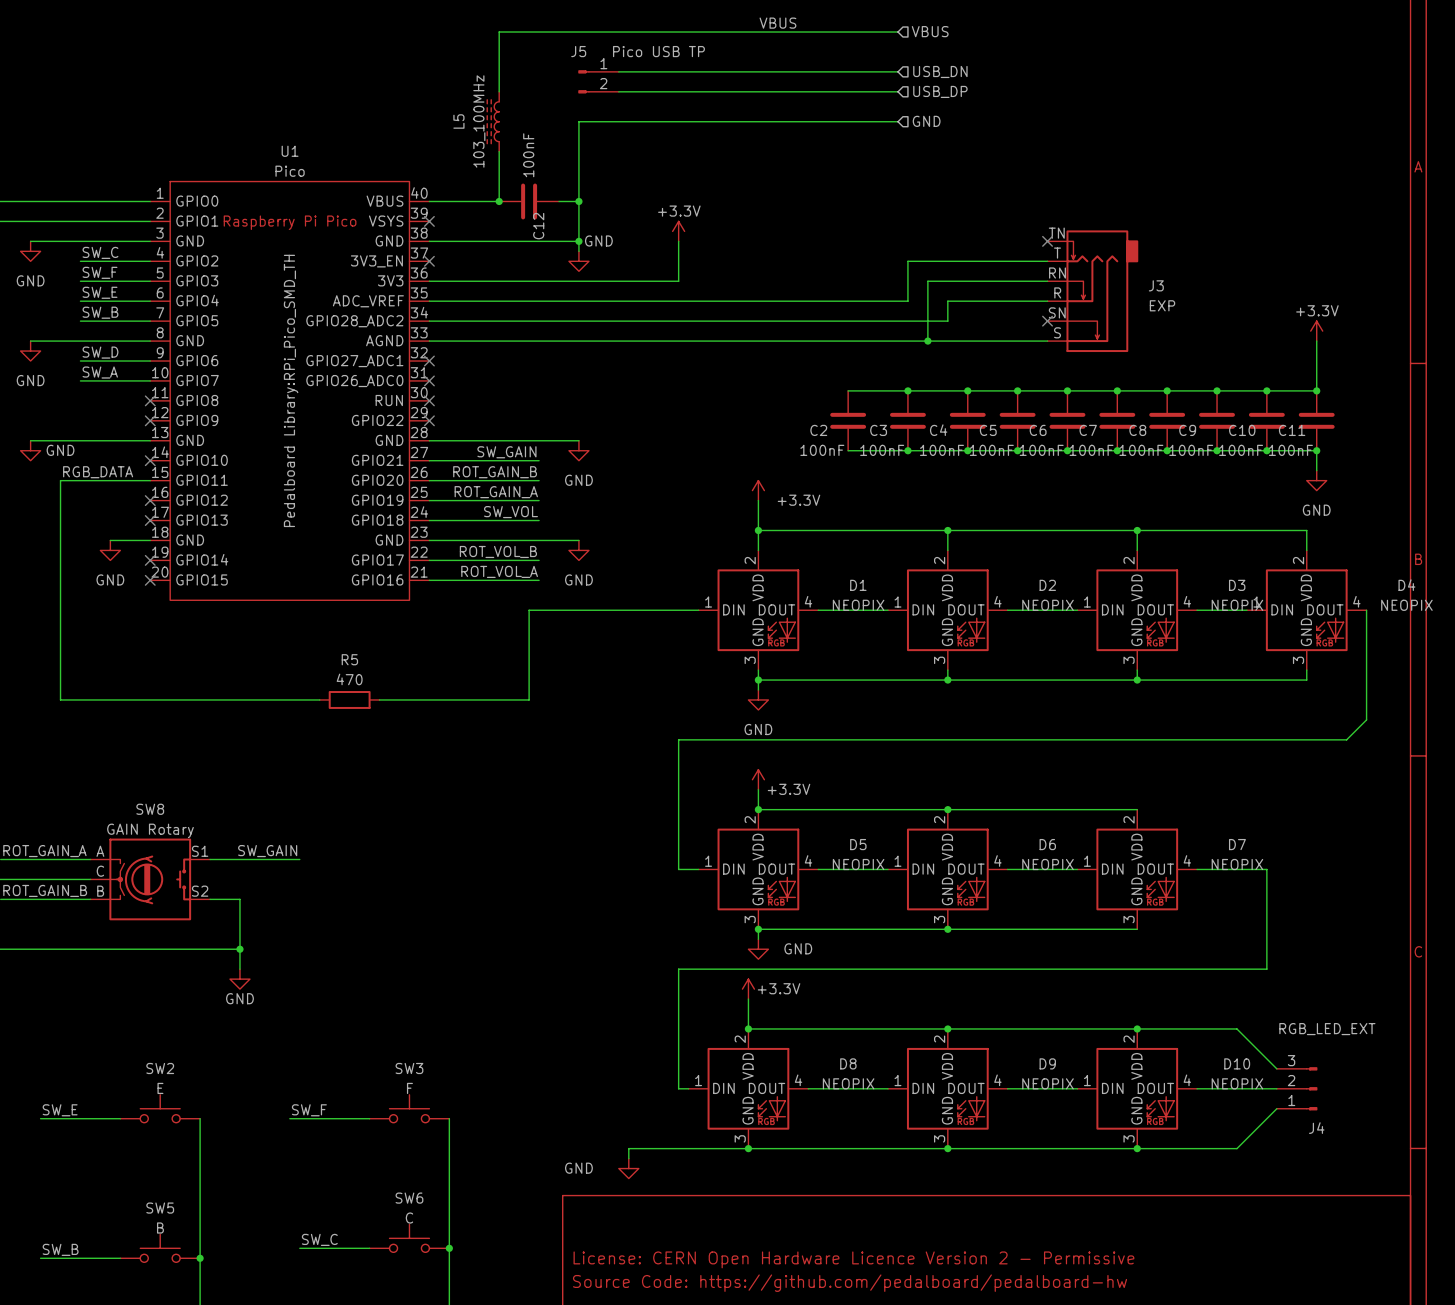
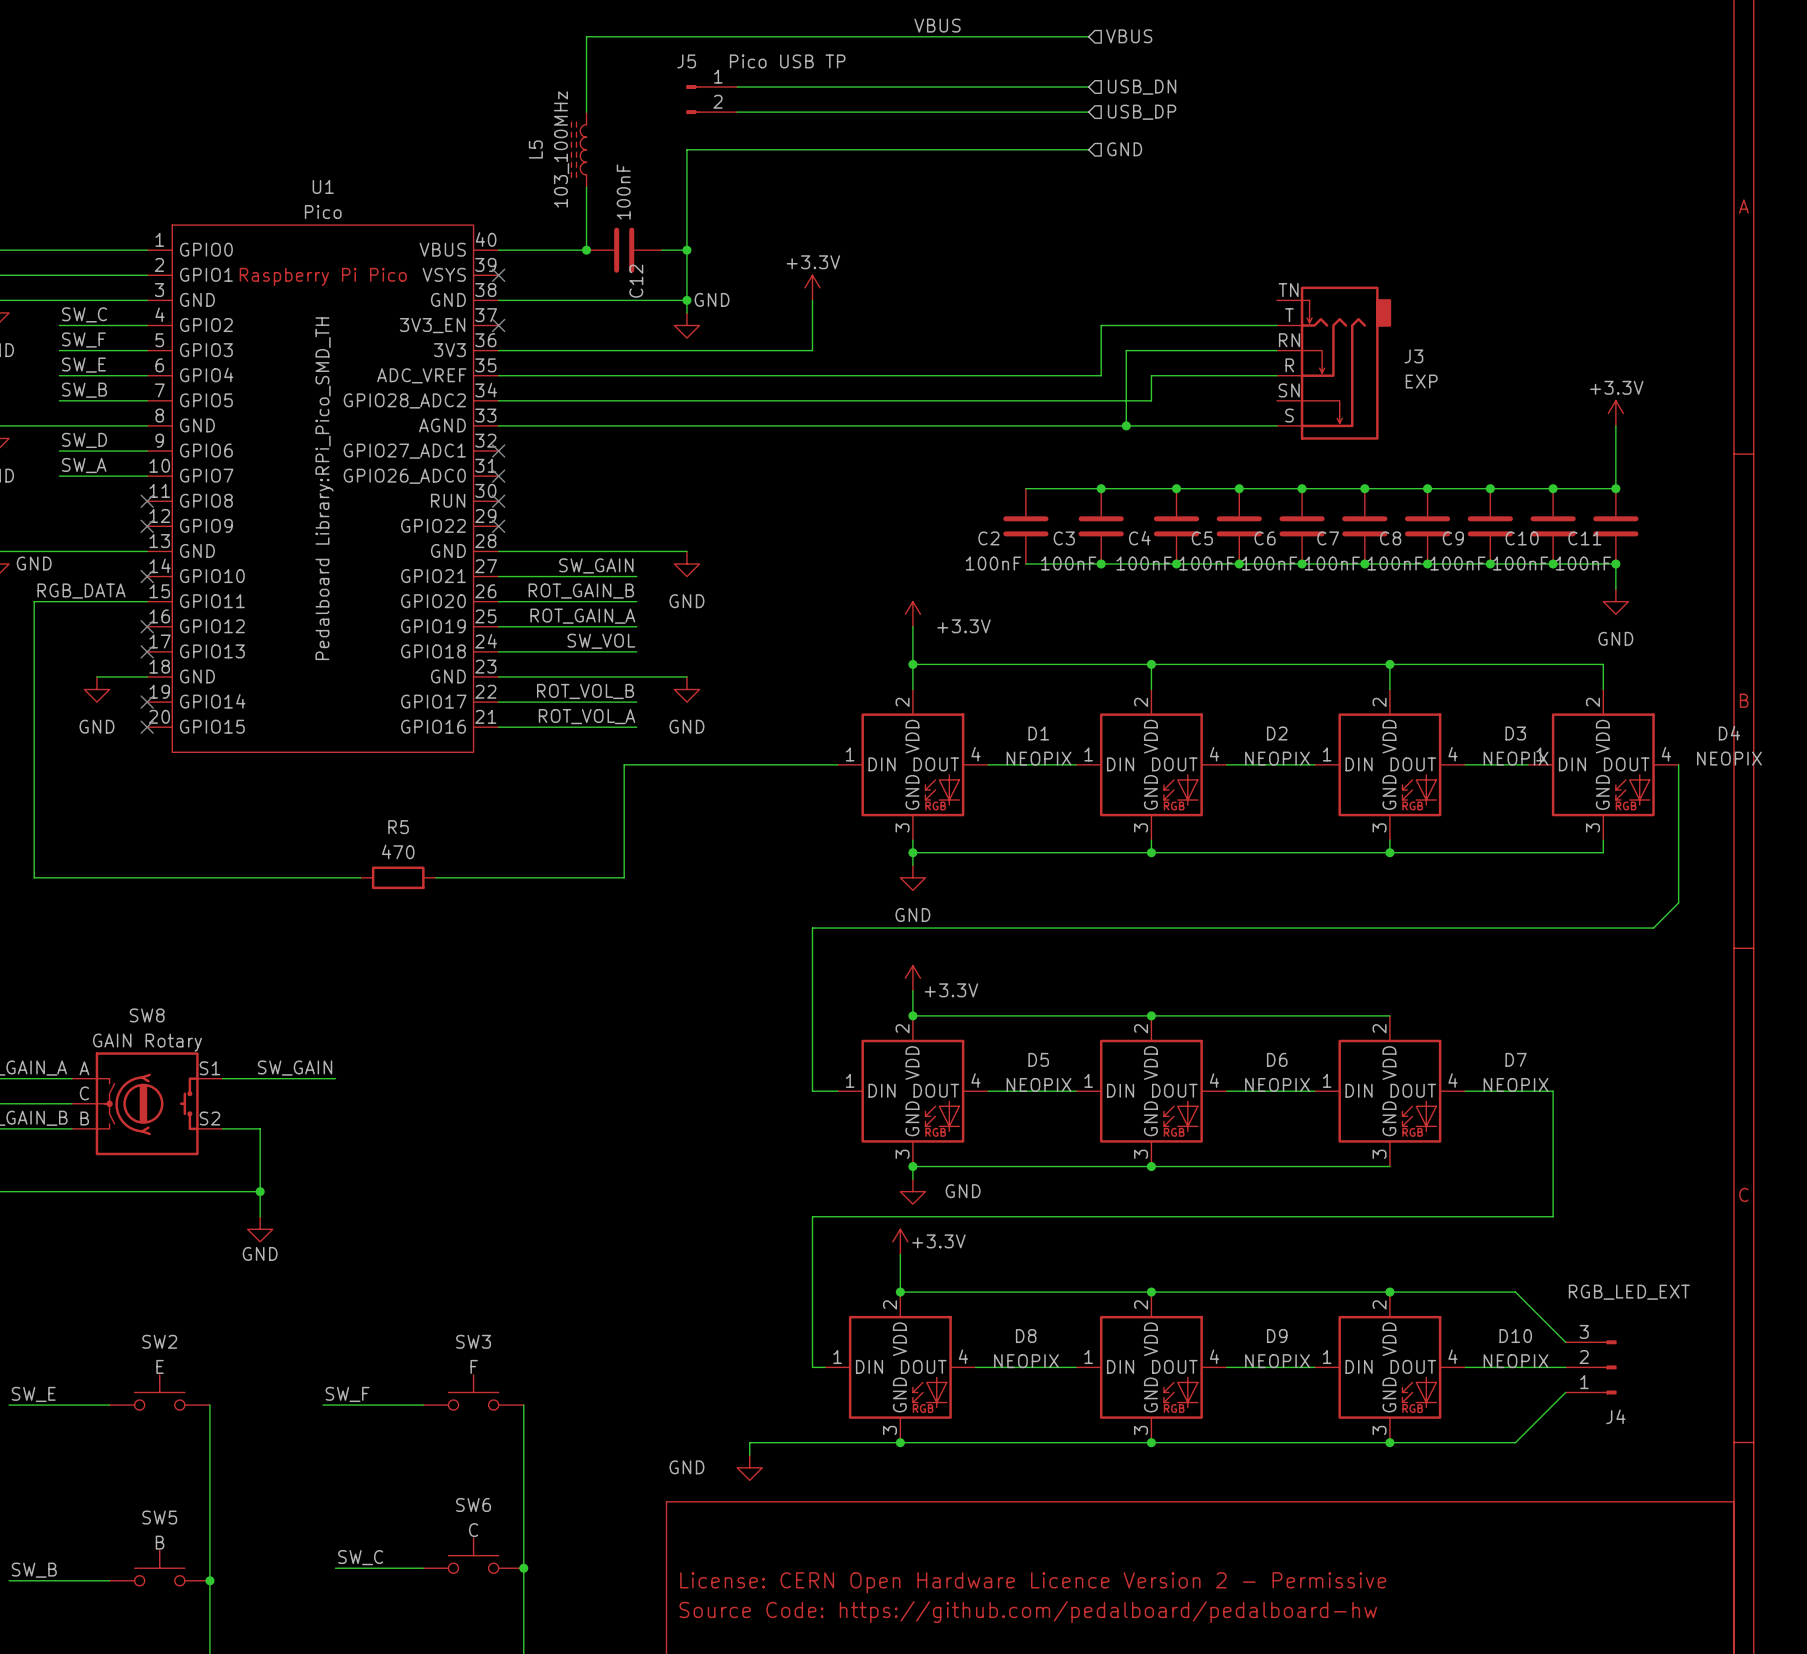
no-connect mark: (1047, 241) -> none
no-connect mark: (1047, 321) -> none

